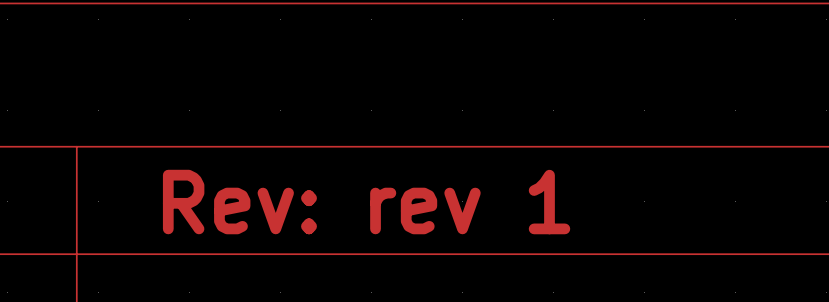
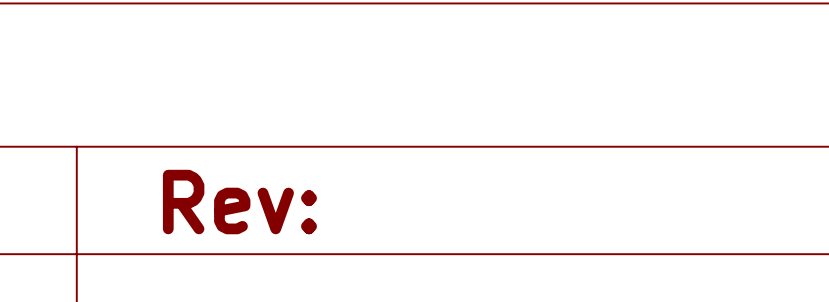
title block: Rev: rev 1 (366, 202) -> Rev: (239, 202)

